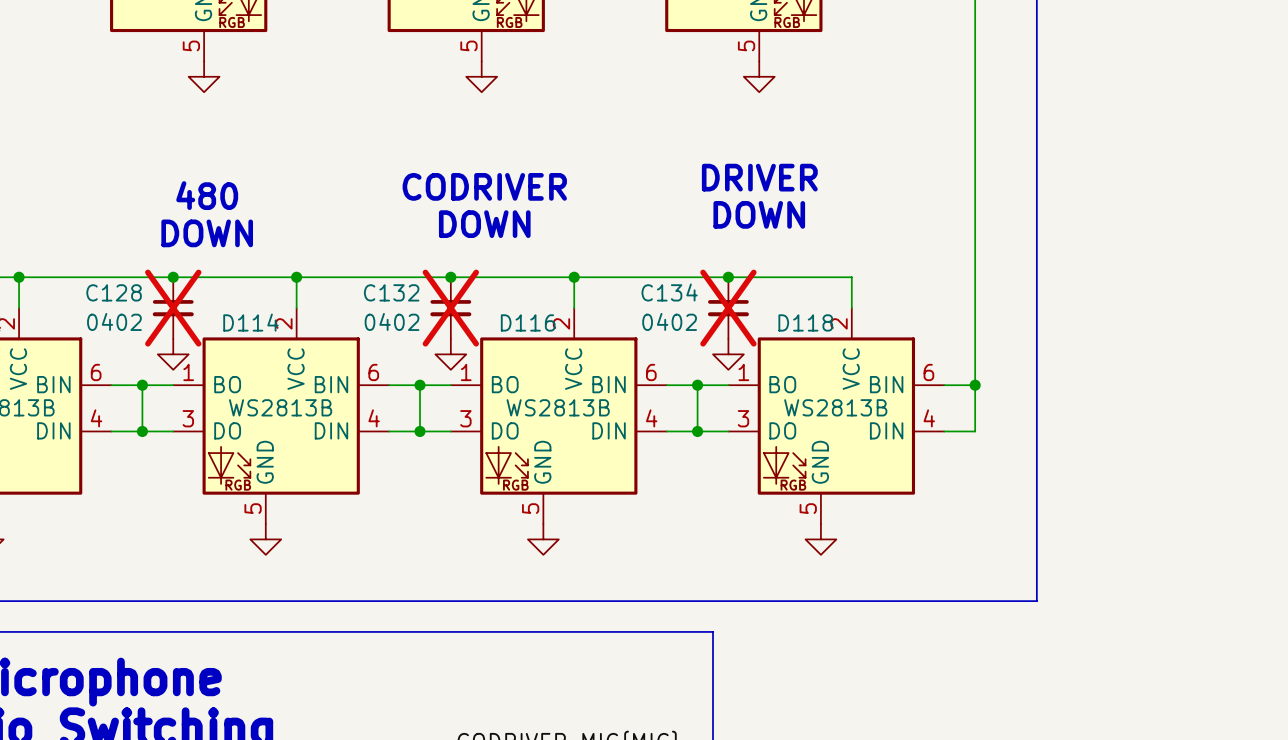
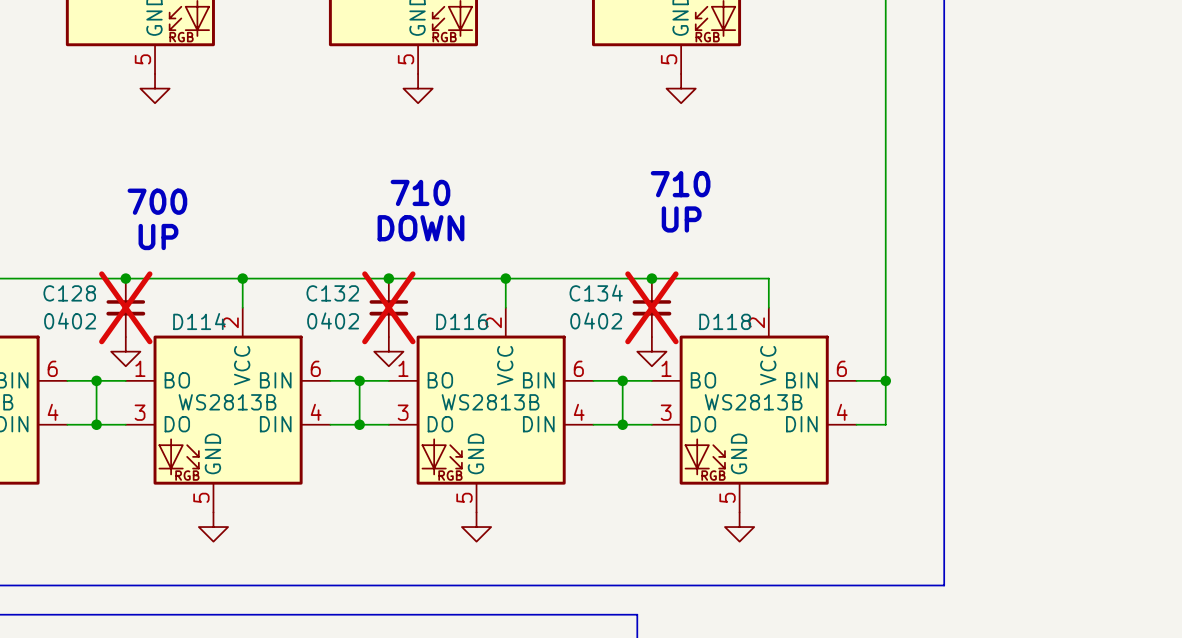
text: DRIVER (759, 177) -> 710 (680, 184)
text: CODRIVER (484, 186) -> 710 (420, 192)
text: 480 (207, 195) -> 700 (157, 201)
text: DOWN (759, 214) -> UP (681, 219)
text: DOWN (207, 233) -> UP (158, 237)

